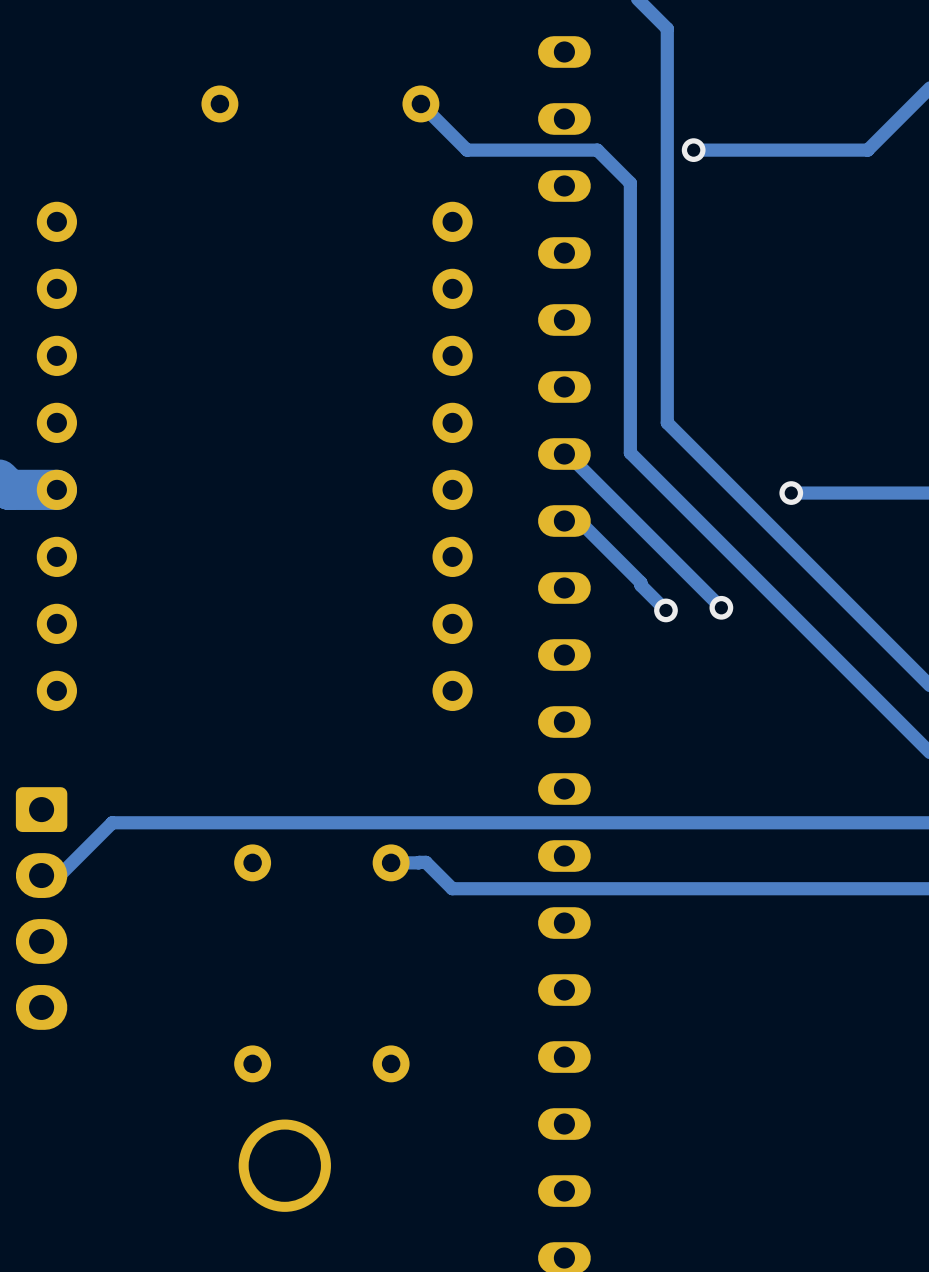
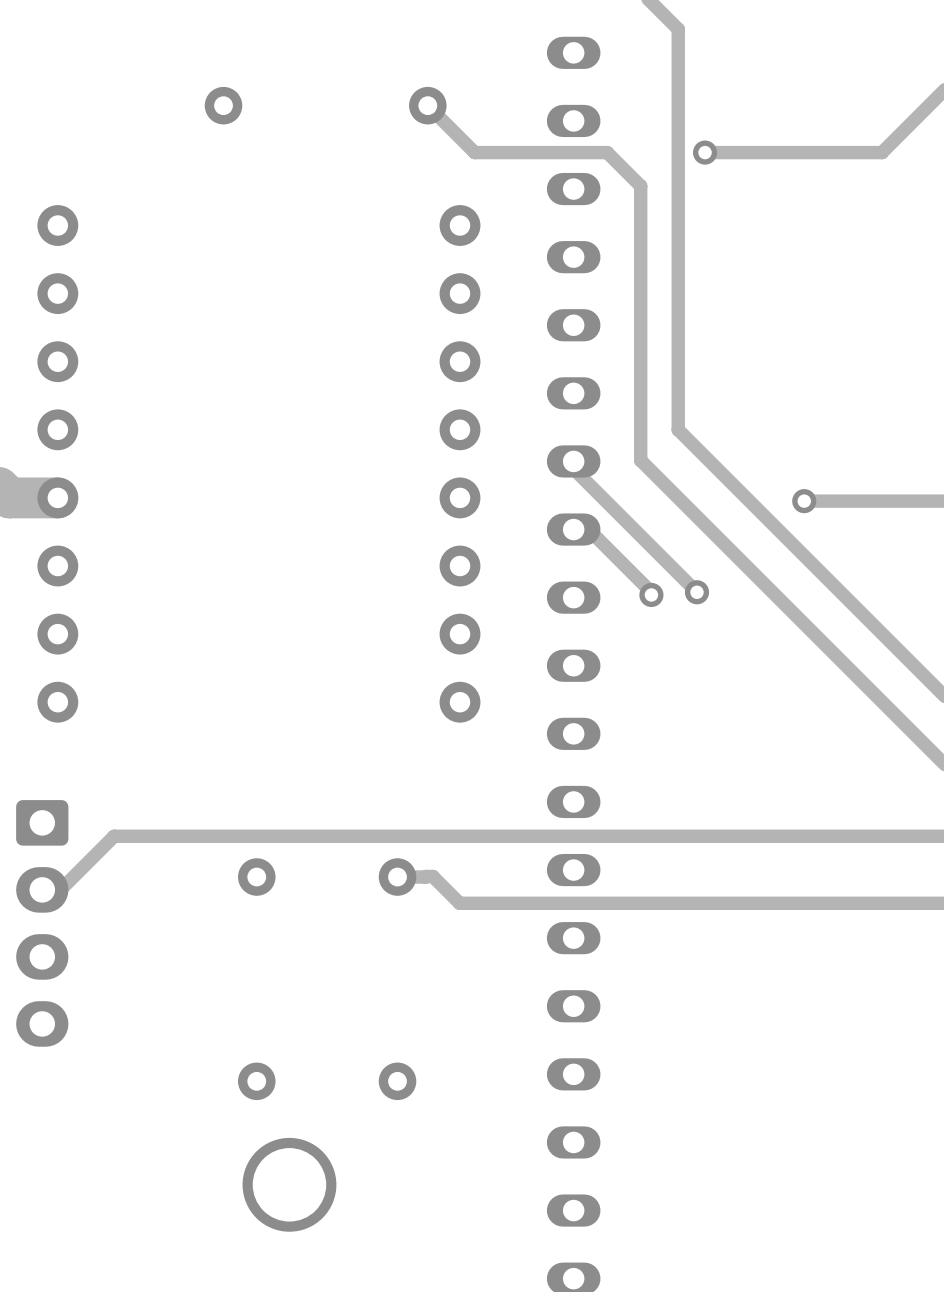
track: (564, 454) (567, 454) (721, 607) -> (573, 461) (573, 468) (697, 592)
via: none -> (697, 592)
track: (640, 585) (665, 610) -> none
via: none -> (651, 594)
via: (721, 607) -> none
via: (665, 610) -> none

